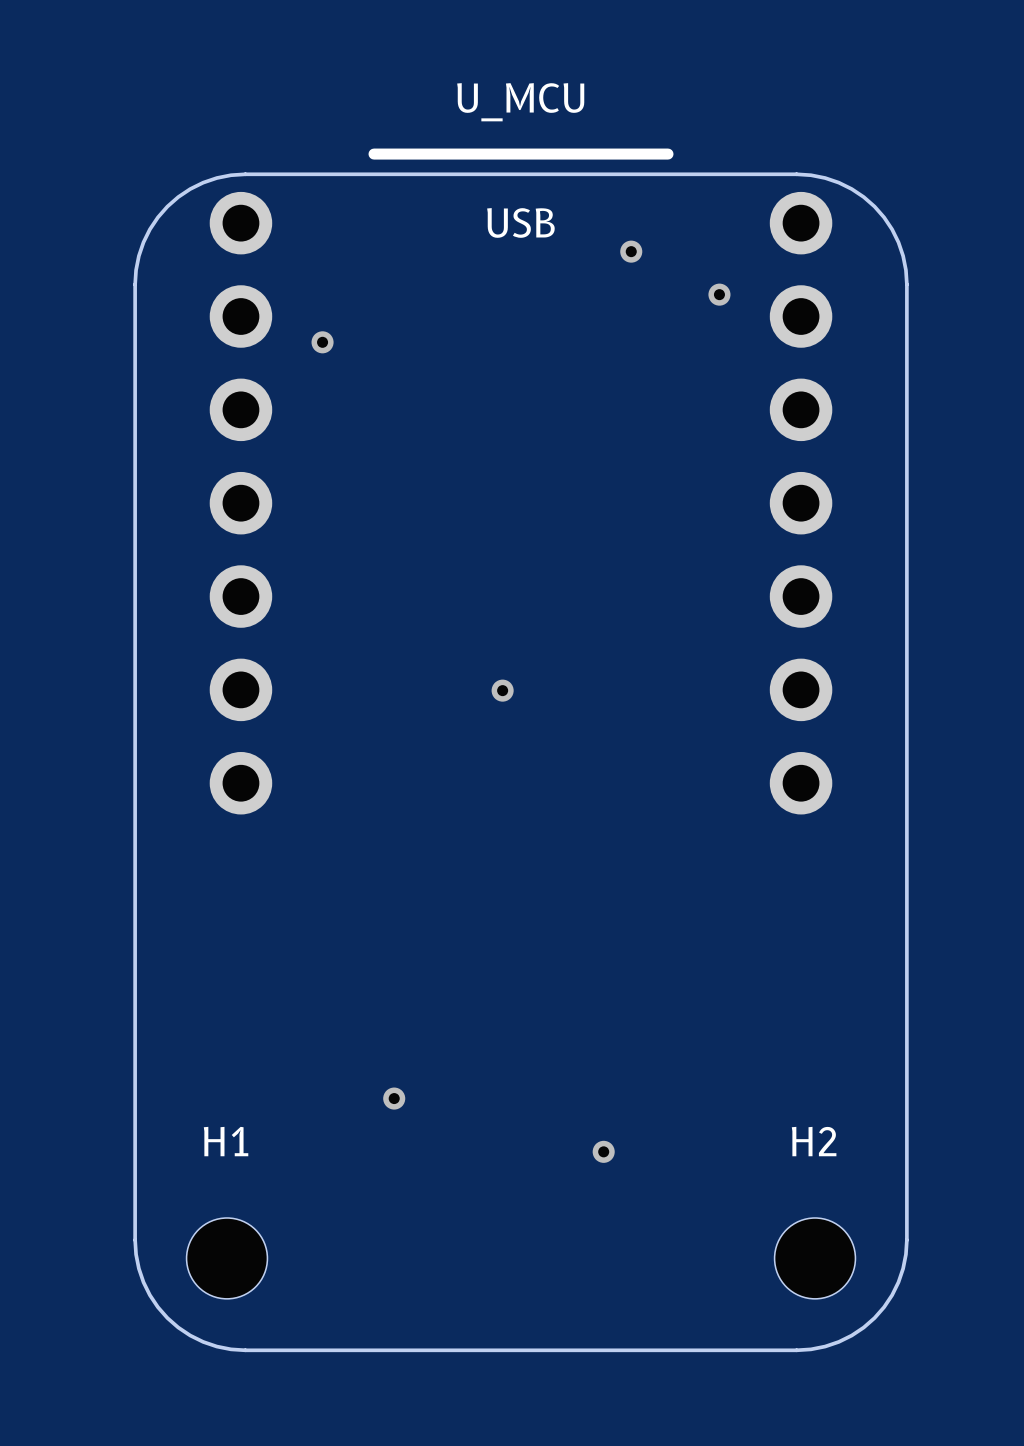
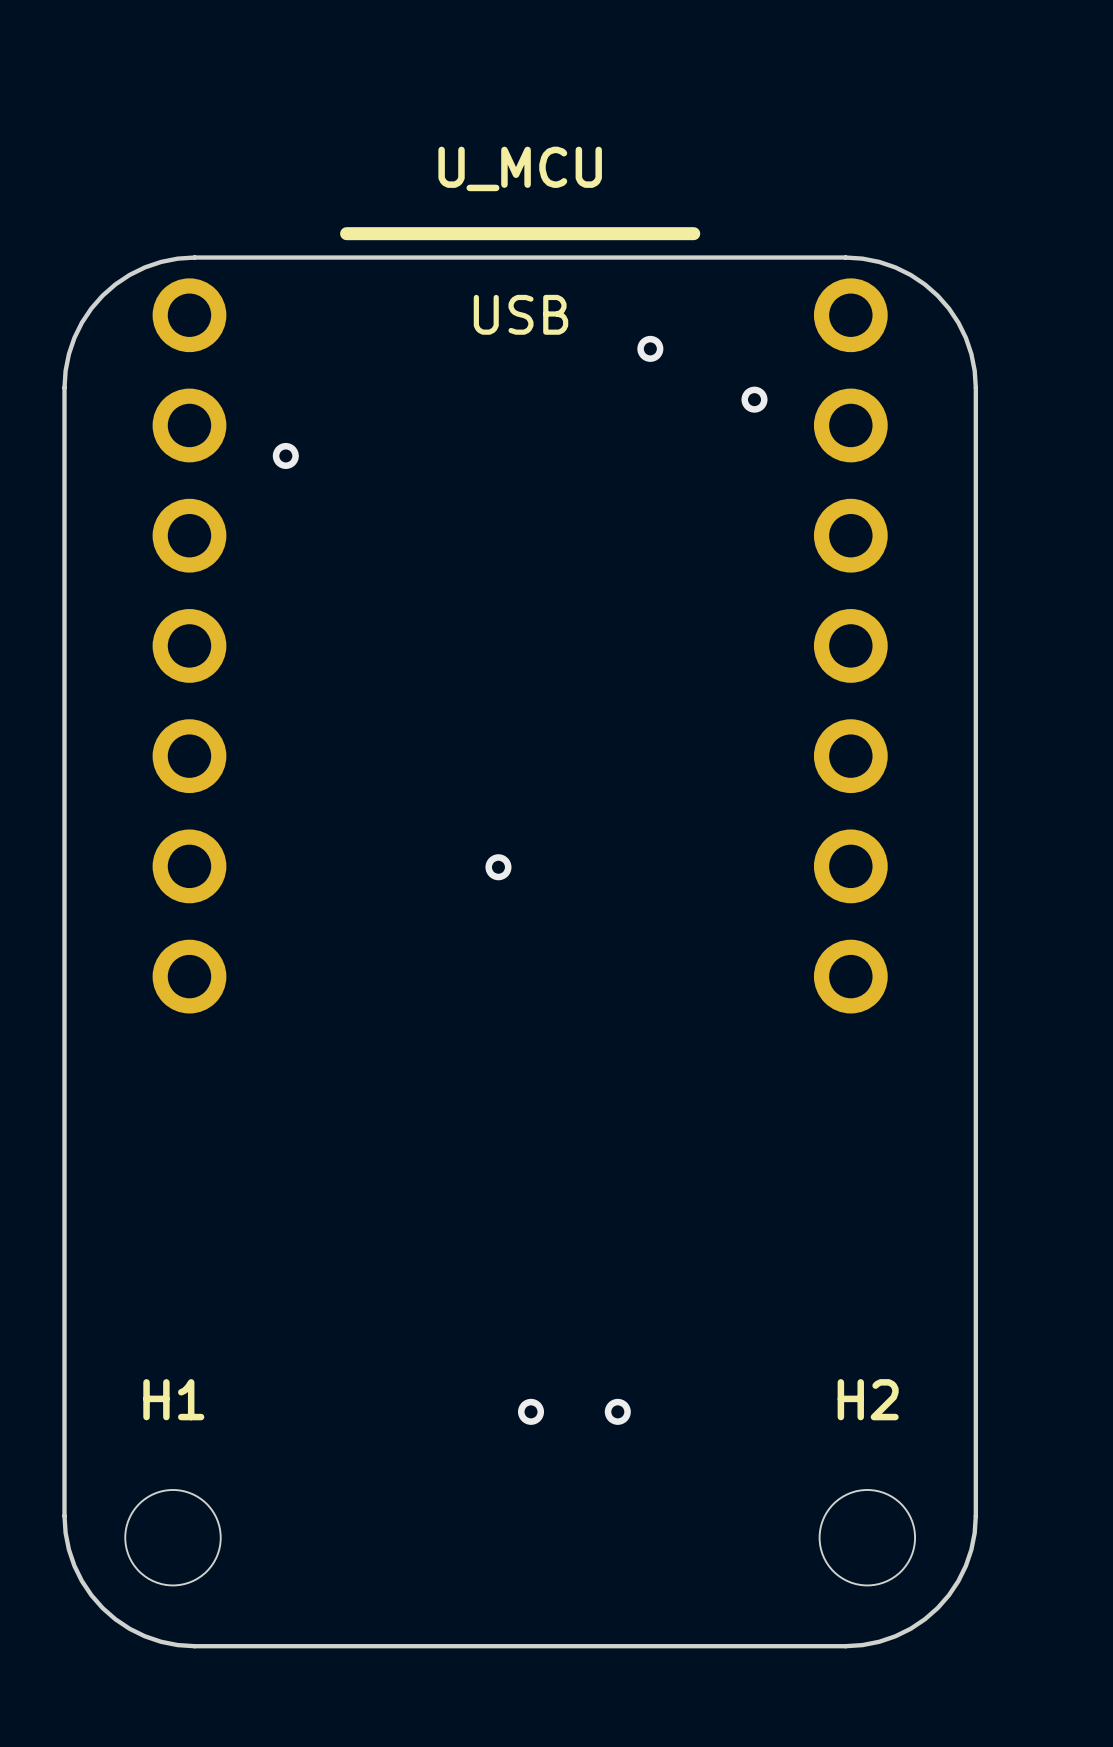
via position: (394, 1098) -> (531, 1411)

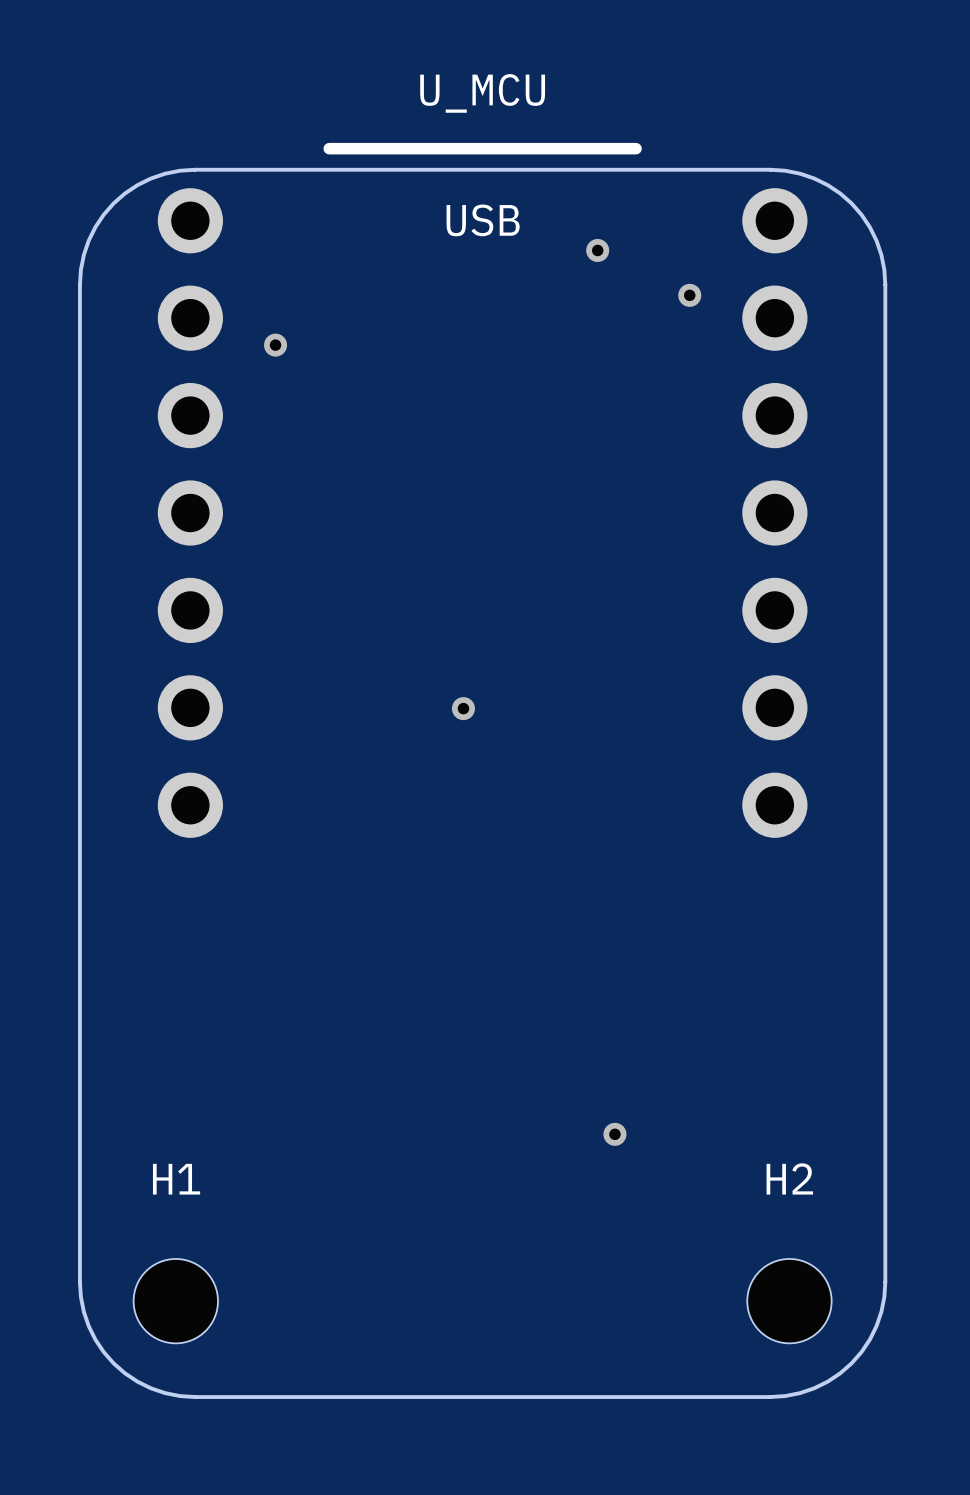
via: none -> (614, 1134)
via: (531, 1411) -> none
via: (617, 1411) -> none

